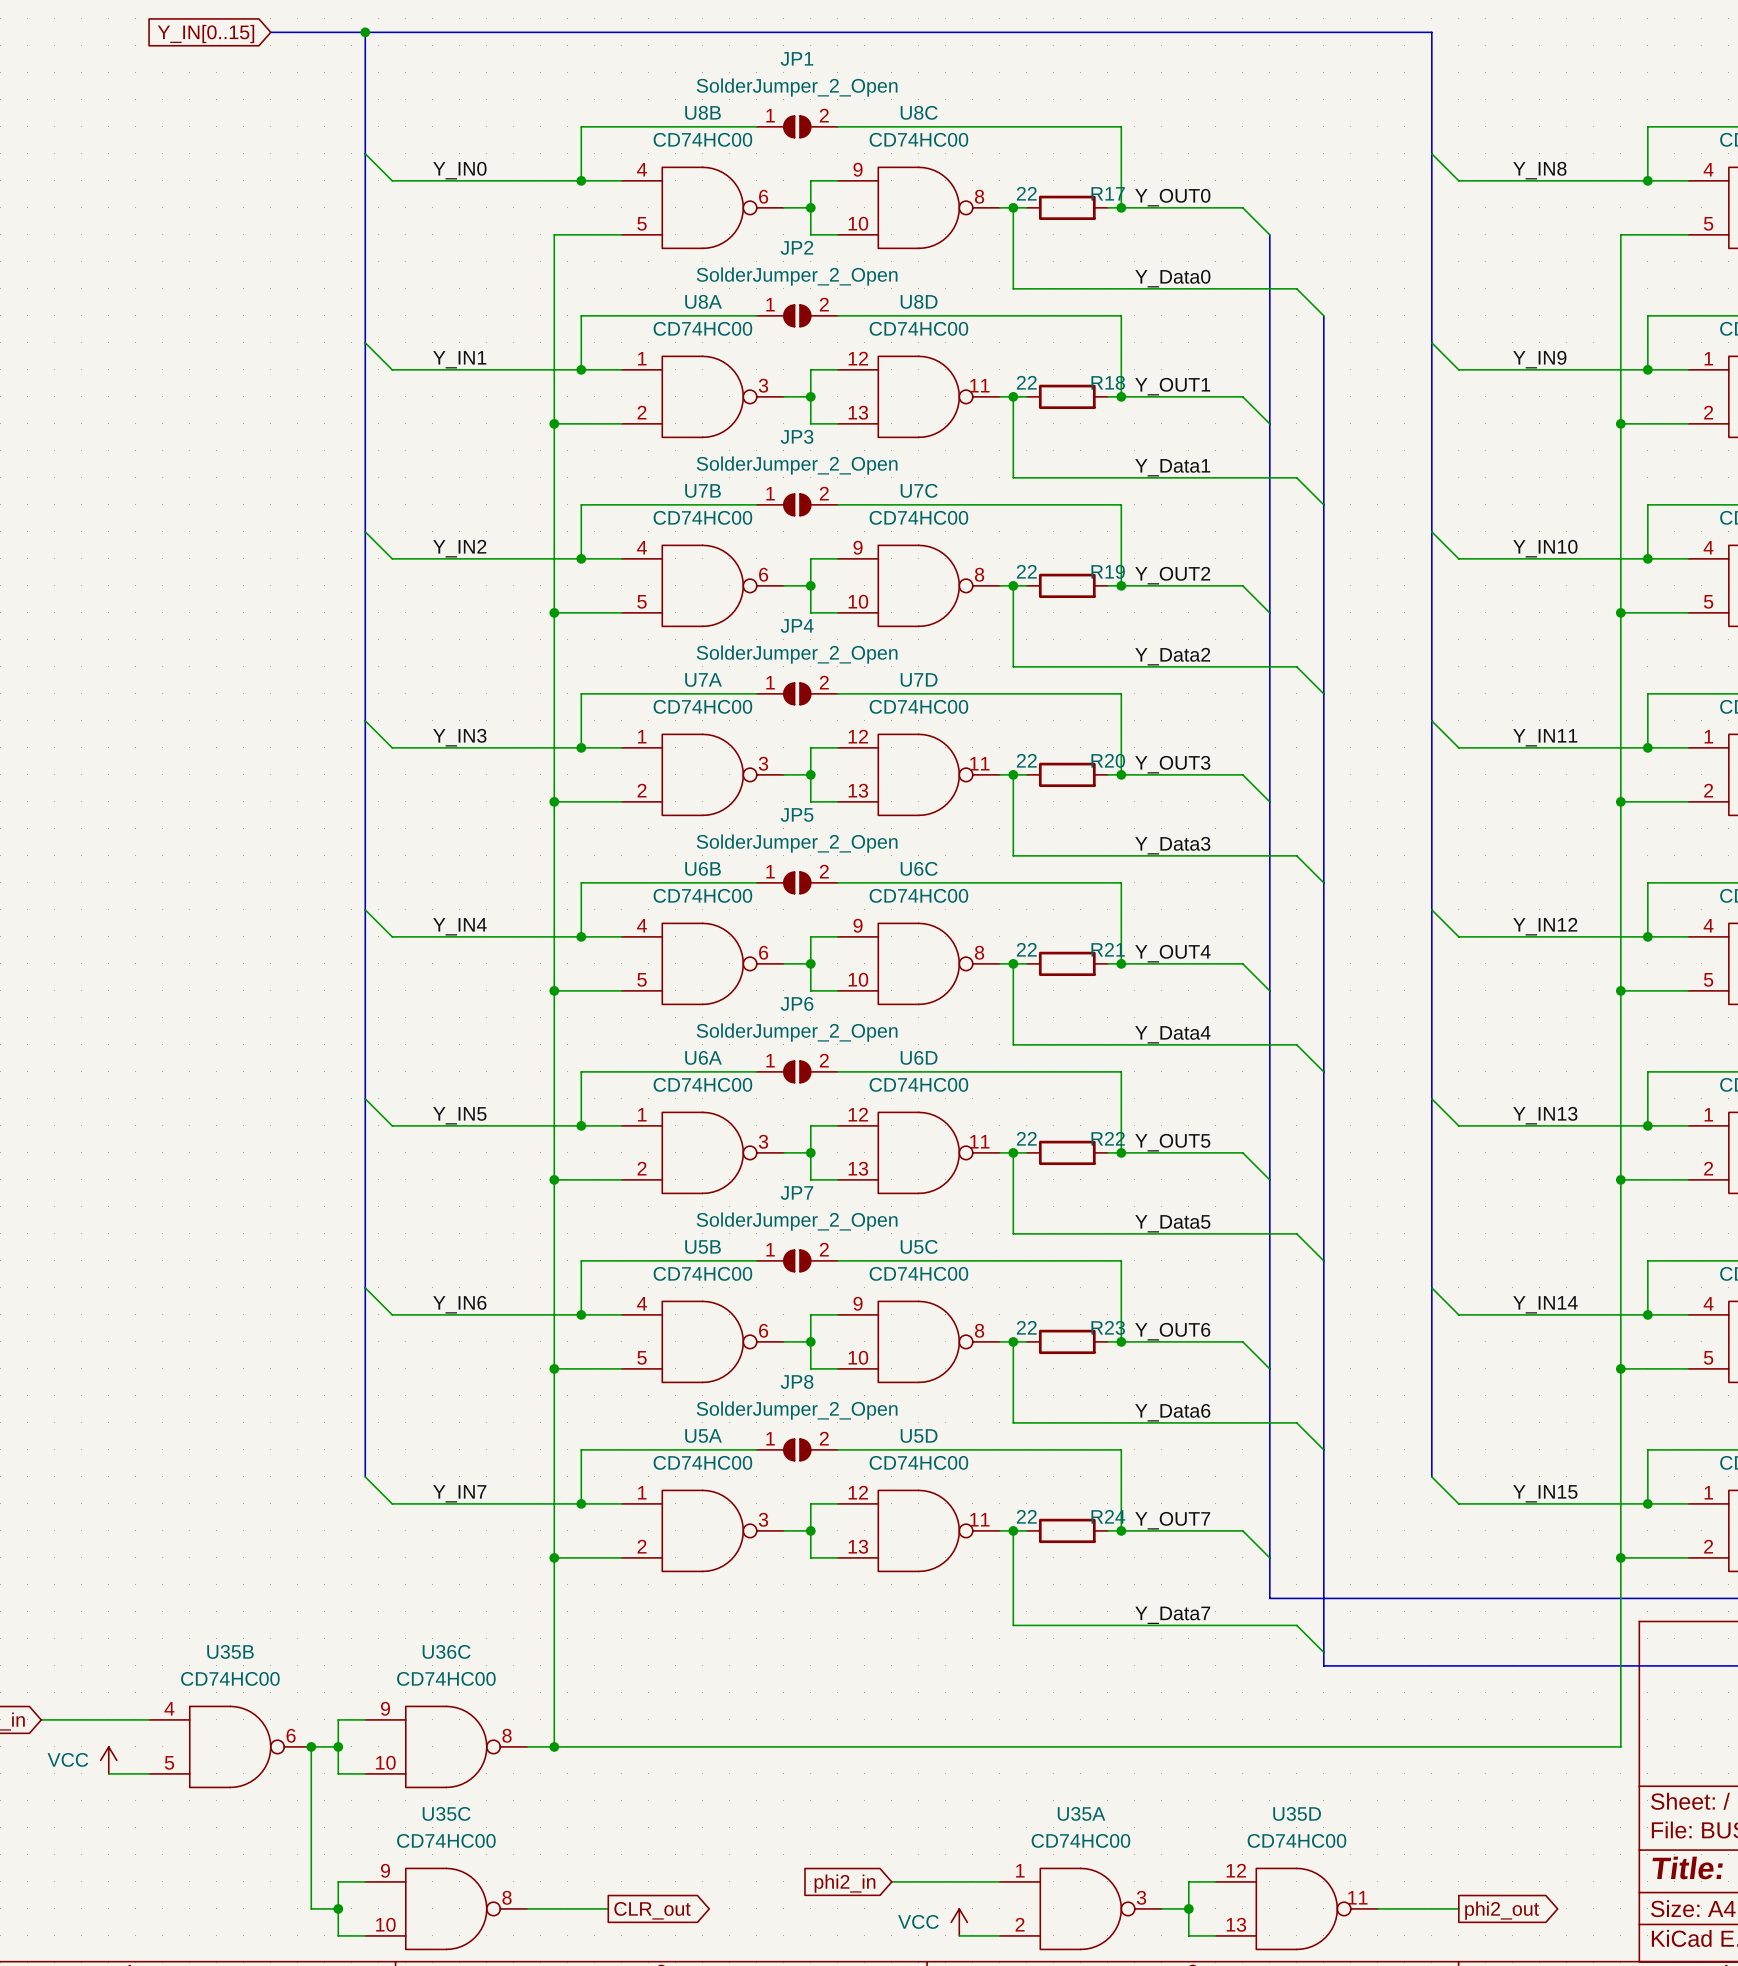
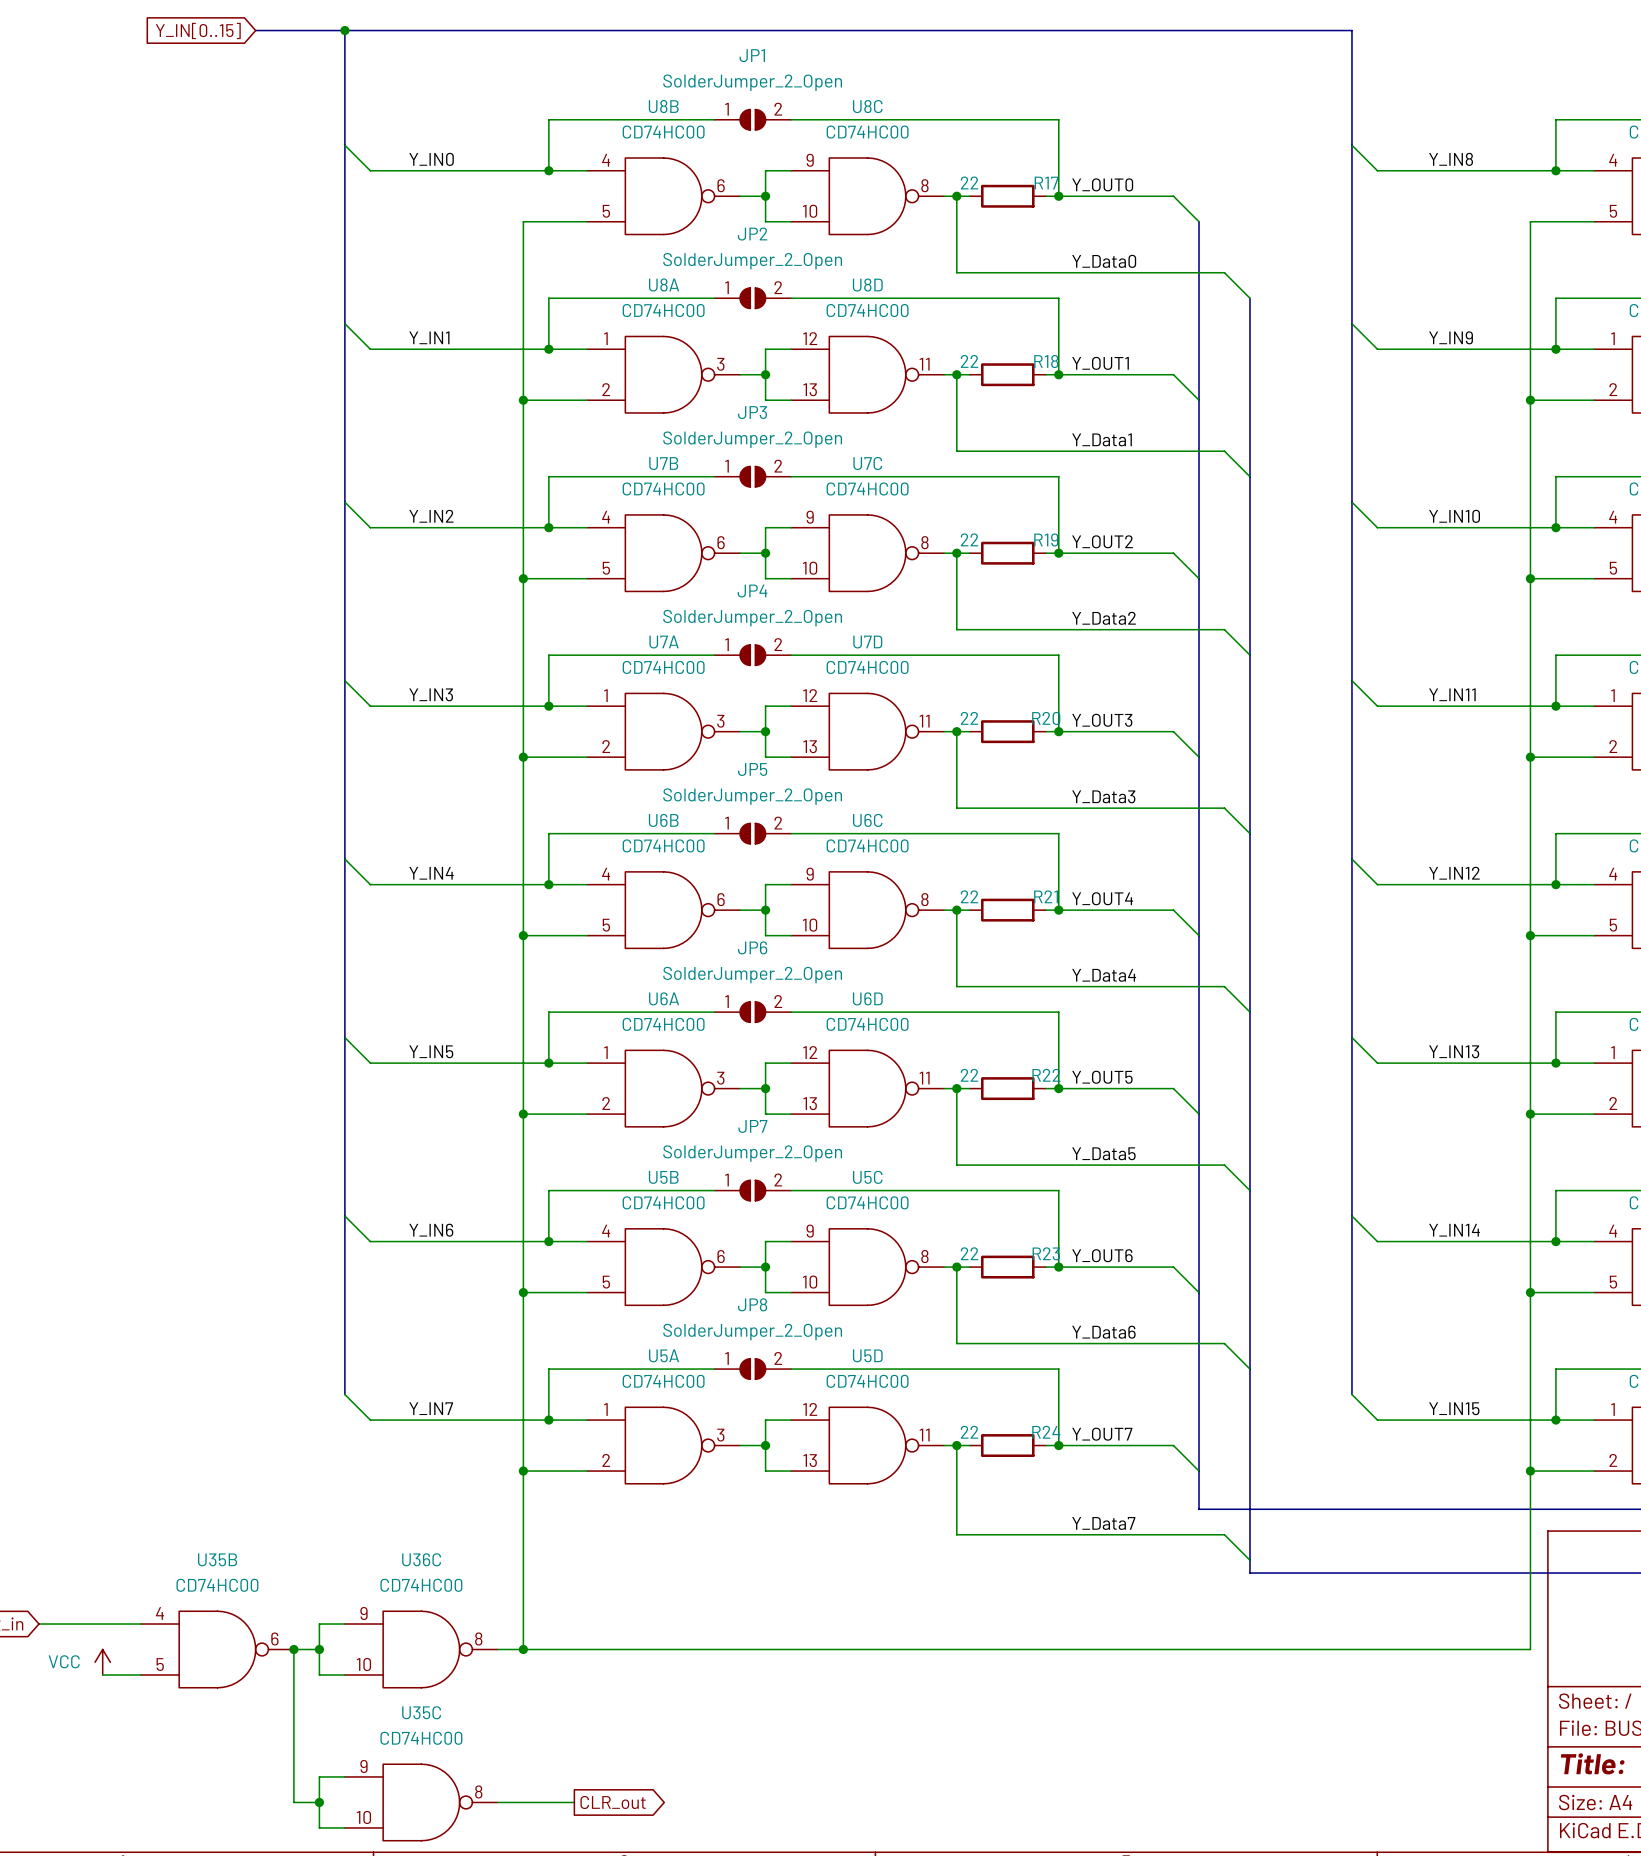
wire: (891, 1881) (999, 1881) -> none
wire: (1215, 1881) (1188, 1881) (1188, 1935) (1215, 1935) -> none
global label: phi2_in (844, 1883) -> none
U35A: CD74HC00 (1080, 1908) -> none
wire: (1161, 1908) (1188, 1908) -> none
junction: (1188, 1908) -> none
U35D: CD74HC00 (1296, 1908) -> none
wire: (1377, 1908) (1458, 1908) -> none
global label: phi2_out (1502, 1910) -> none
power symbol: VCC (959, 1922) -> none
wire: (959, 1935) (999, 1935) -> none

